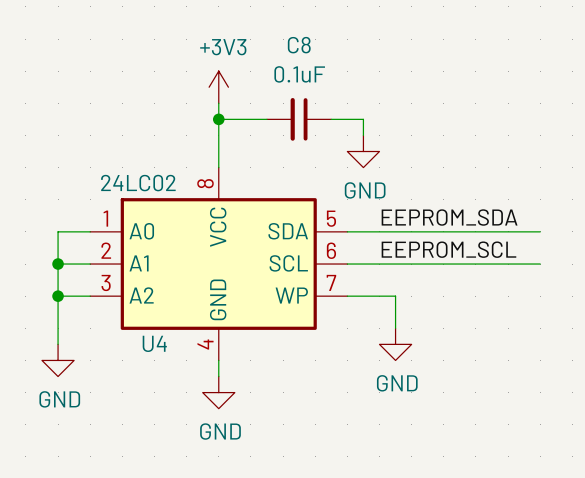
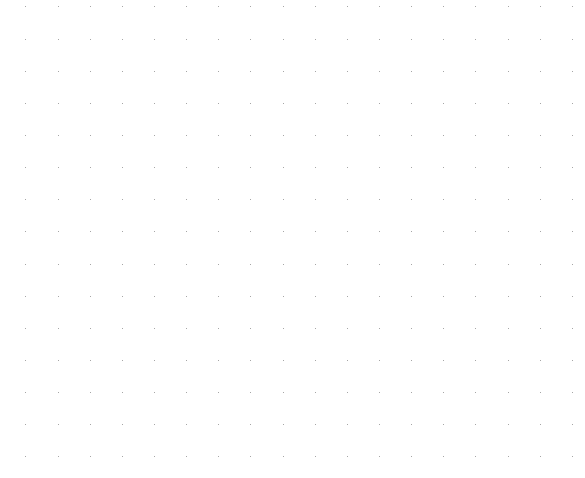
power symbol: +3V3 (218, 87) -> none
wire: (218, 103) (218, 167) -> none
wire: (218, 119) (266, 119) -> none
junction: (218, 119) -> none
C8: 0.1uF (299, 119) -> none
wire: (331, 119) (363, 119) (363, 135) -> none
power symbol: GND (363, 151) -> none
label: EEPROM_SDA (449, 217) -> none
wire: (90, 231) (58, 231) (58, 344) -> none
wire: (347, 231) (540, 231) -> none
label: EEPROM_SCL (448, 249) -> none
wire: (58, 264) (90, 264) -> none
junction: (58, 264) -> none
U4: 24LC02 (218, 264) -> none
wire: (347, 264) (540, 264) -> none
wire: (58, 296) (90, 296) -> none
junction: (58, 296) -> none
wire: (347, 296) (395, 296) (395, 328) -> none
power symbol: GND (395, 344) -> none
power symbol: GND (58, 360) -> none
wire: (218, 360) (218, 376) -> none
power symbol: GND (218, 392) -> none

